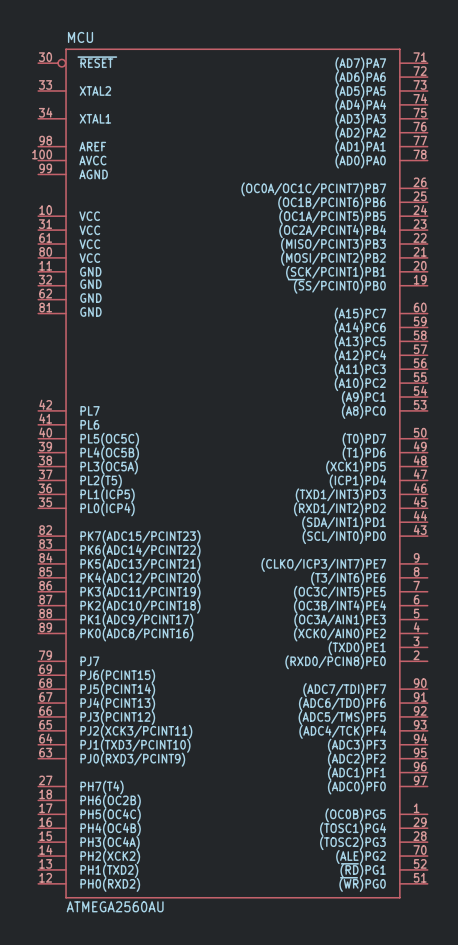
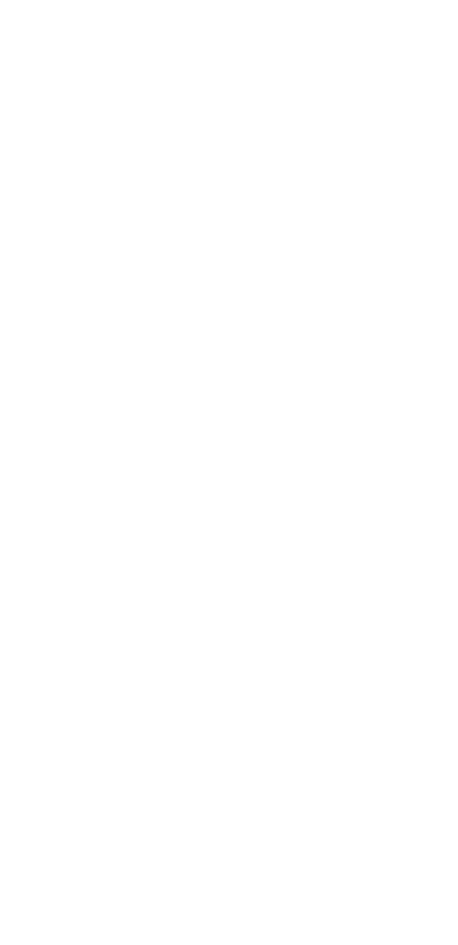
MCU: ATMEGA2560AU (232, 473) -> none

